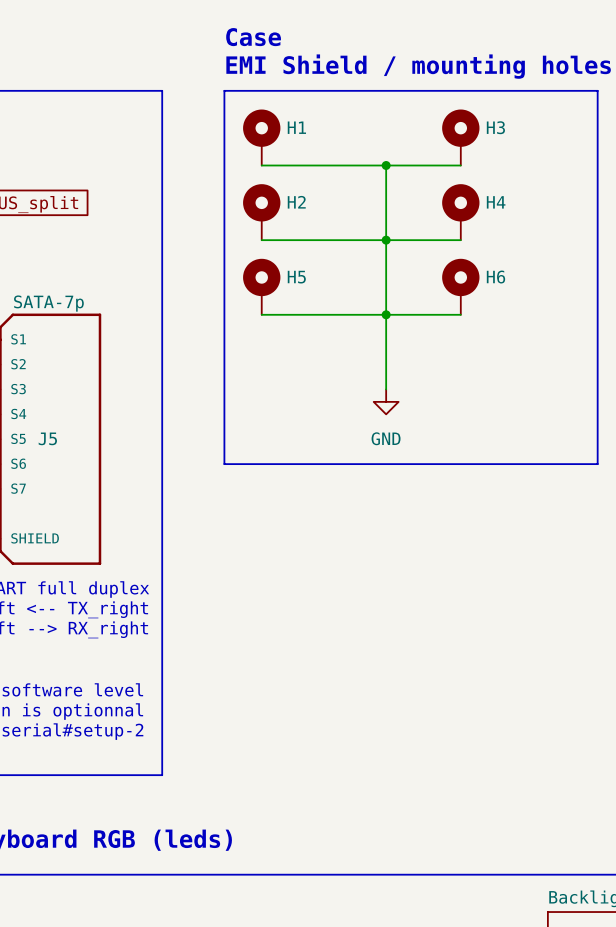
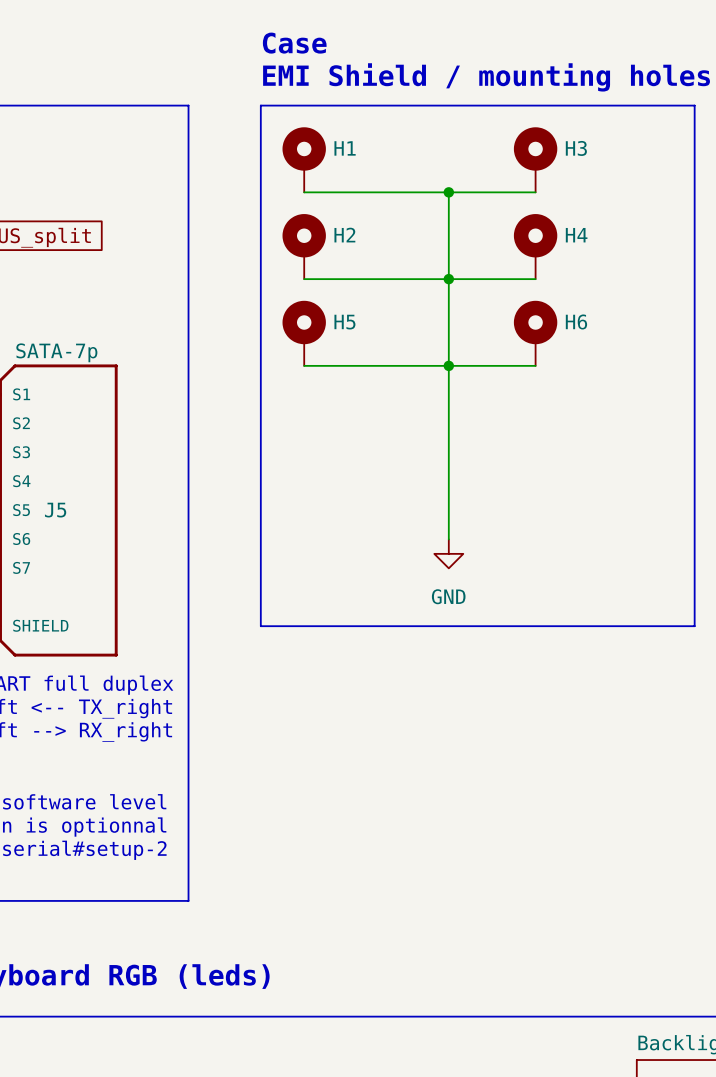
wire: none -> (448, 452) (448, 539)
power symbol position: GND (386, 401) -> GND (448, 553)
line: (224, 464) (597, 464) -> (260, 539) (260, 626) (694, 626) (694, 539)

